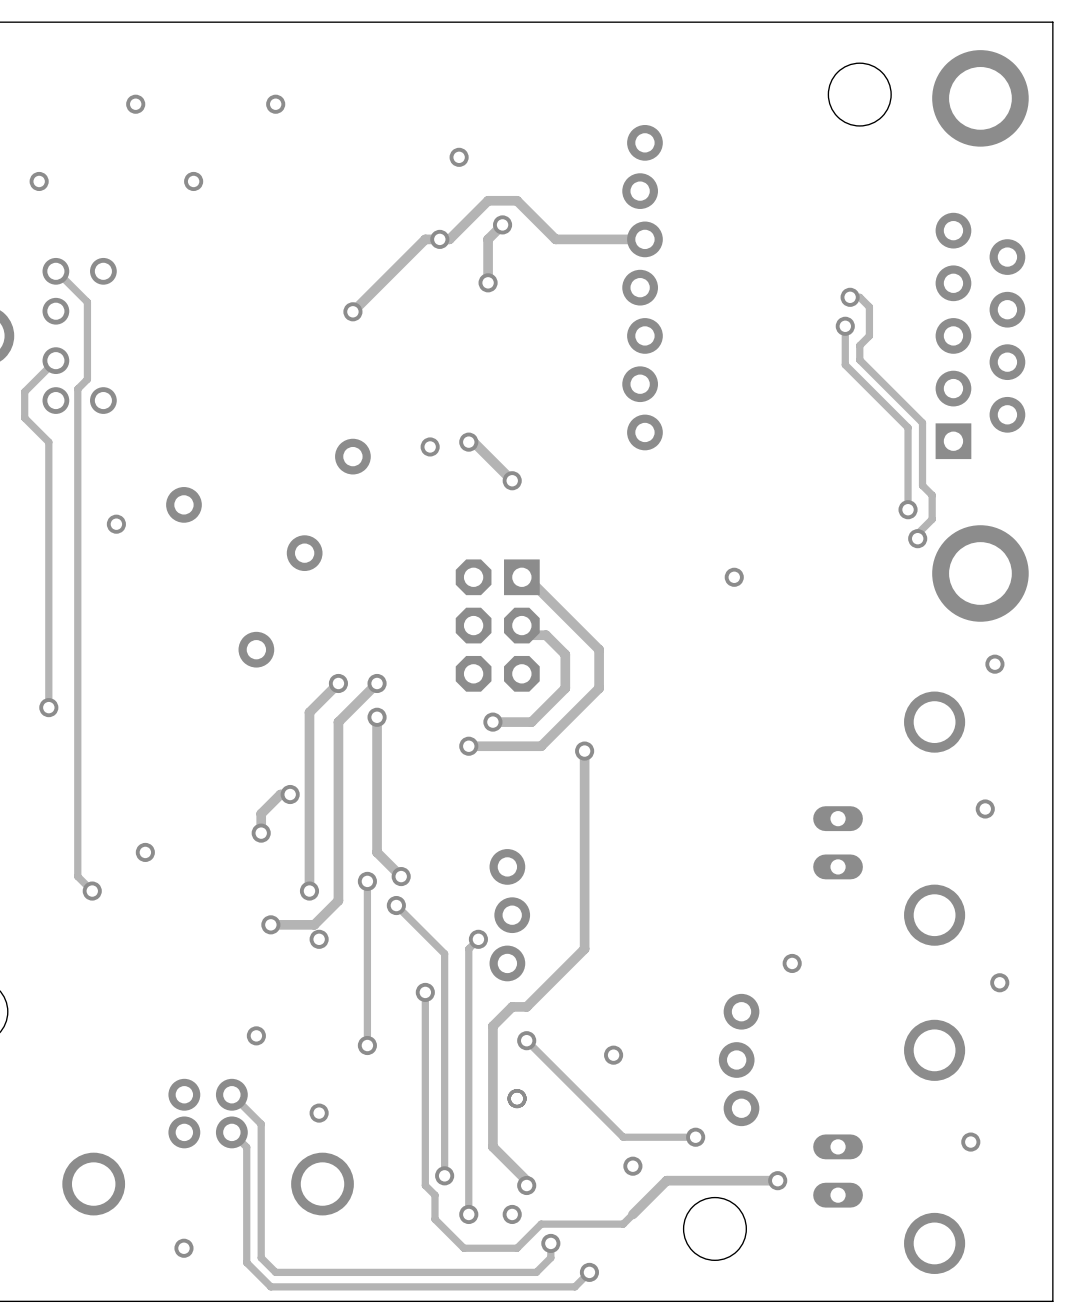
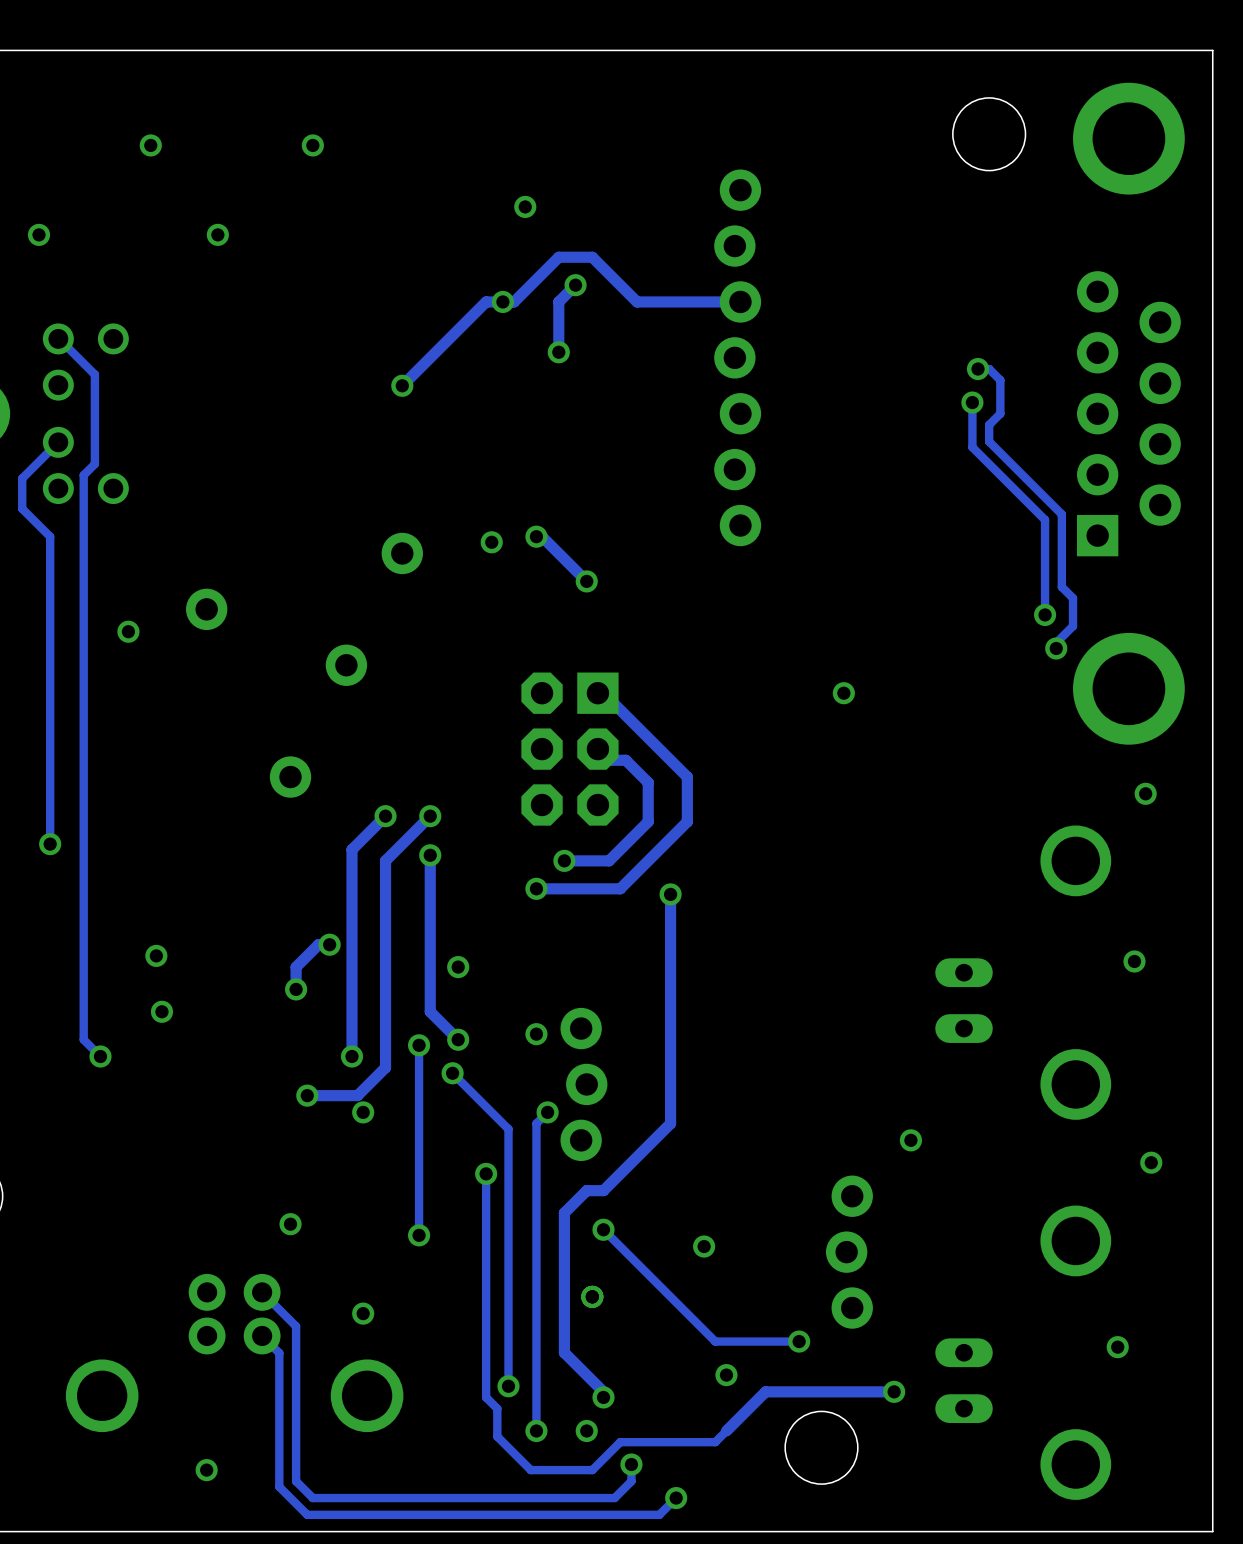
via: none -> (156, 955)
via: none -> (458, 967)
via: none -> (536, 1034)

